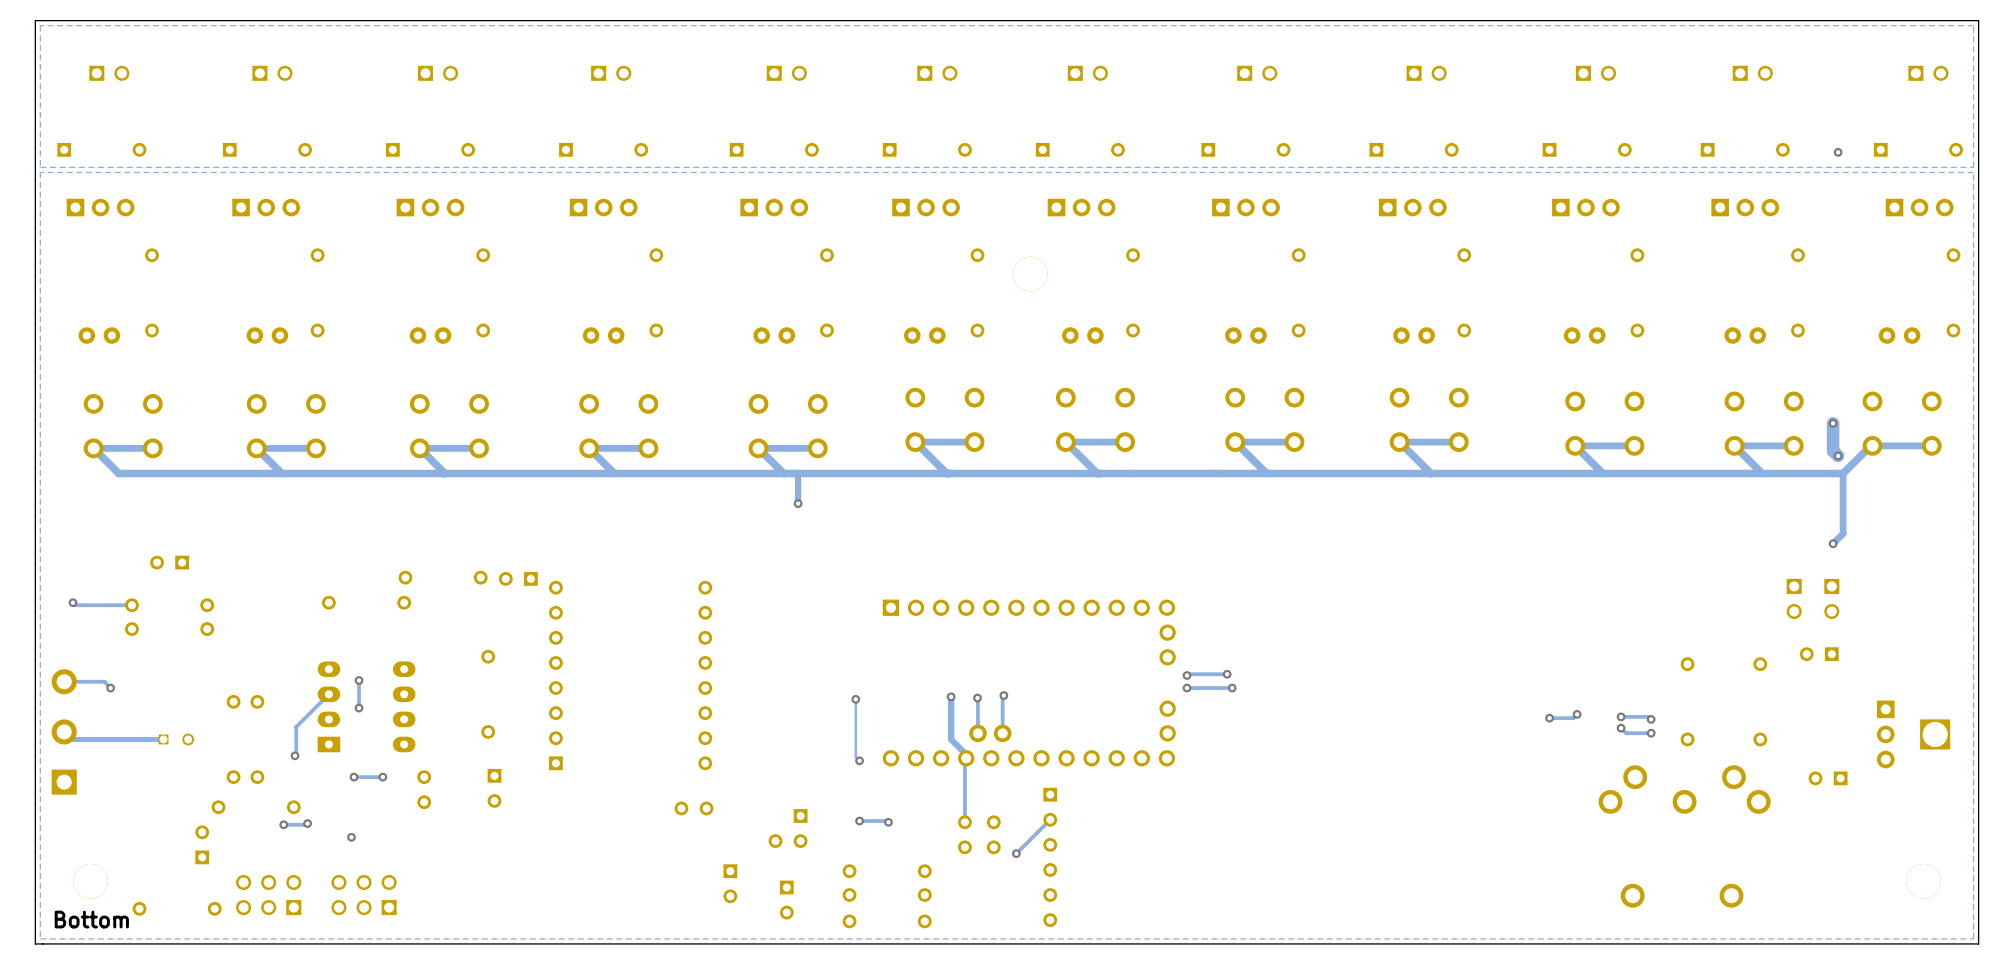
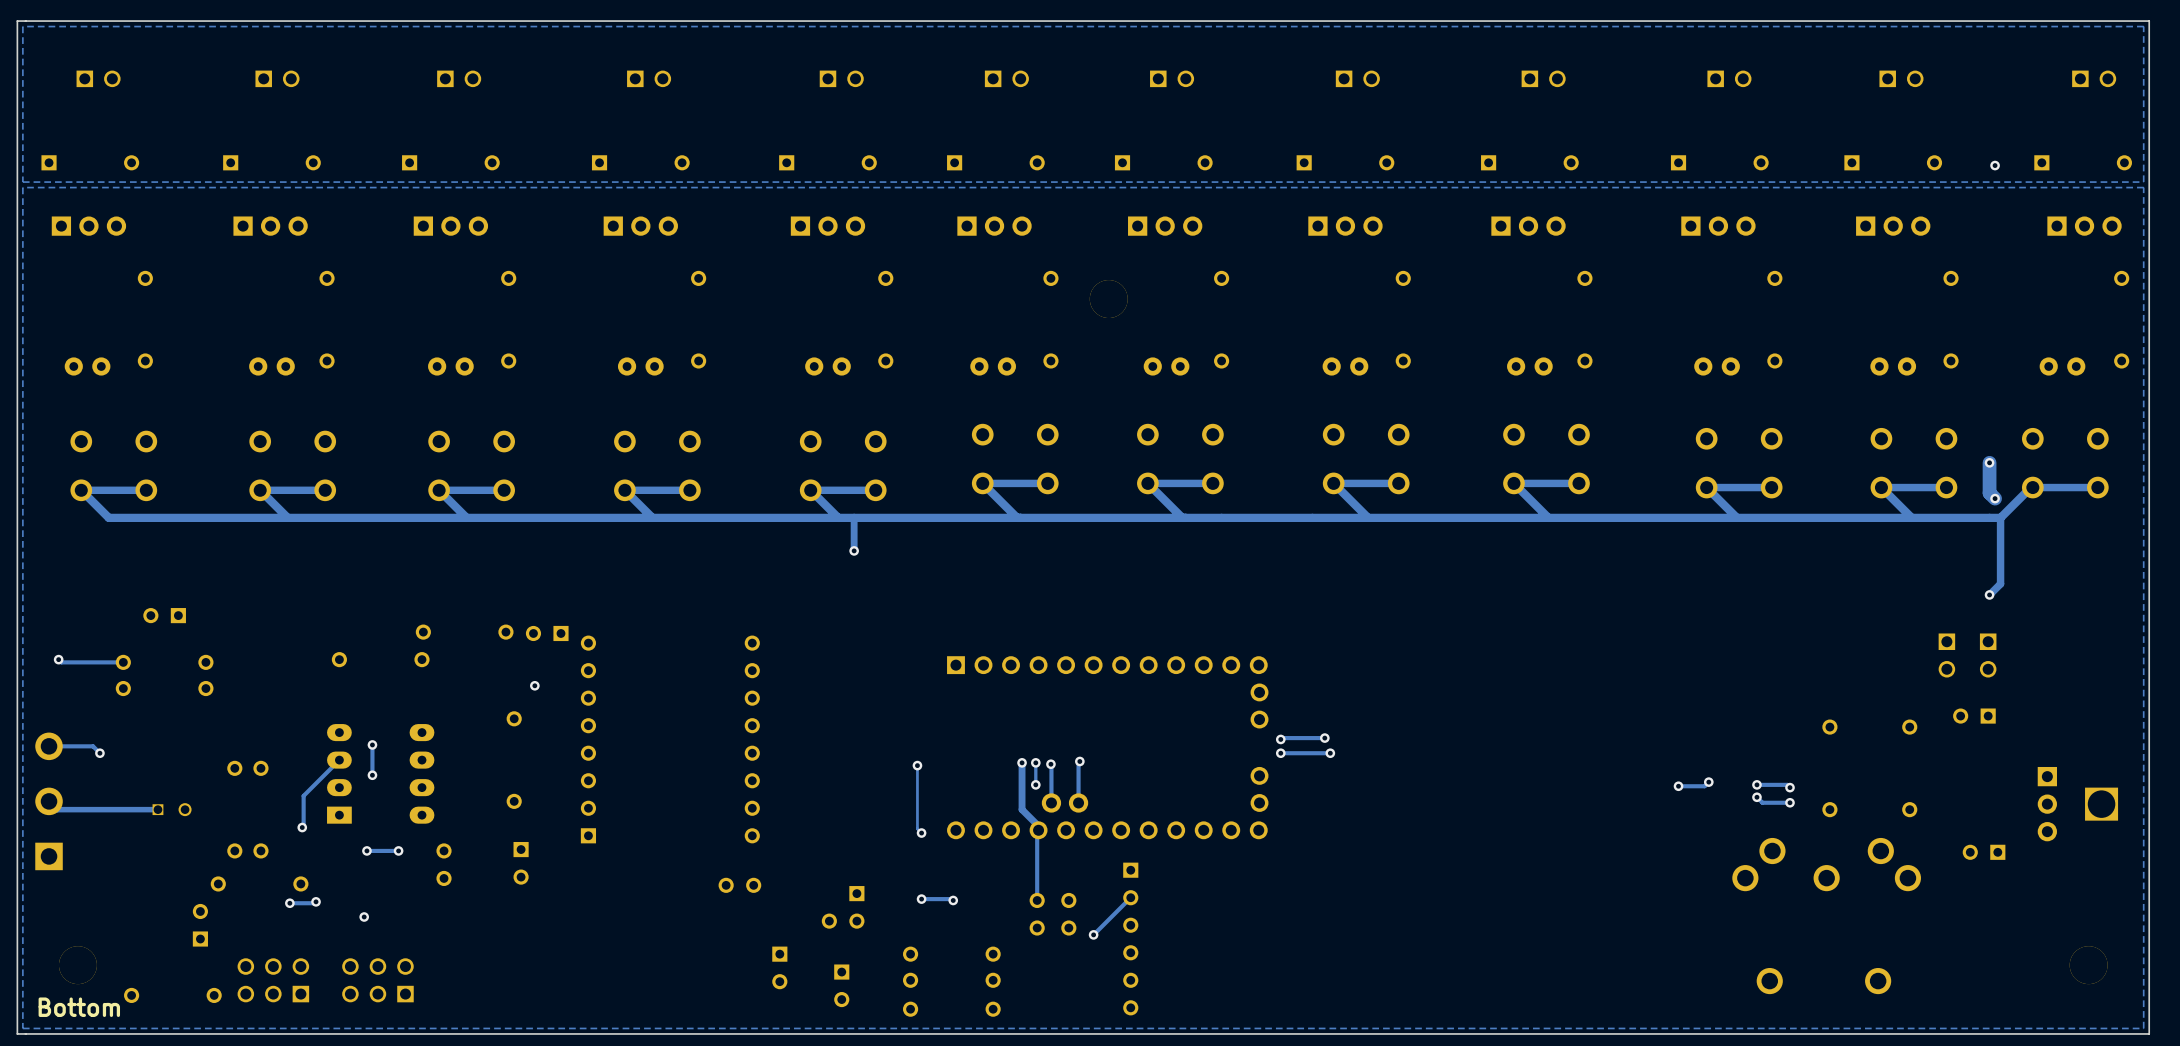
via: none -> (534, 685)
track: none -> (1035, 762) (1035, 784)
via: none -> (1035, 762)
via: none -> (1035, 784)

